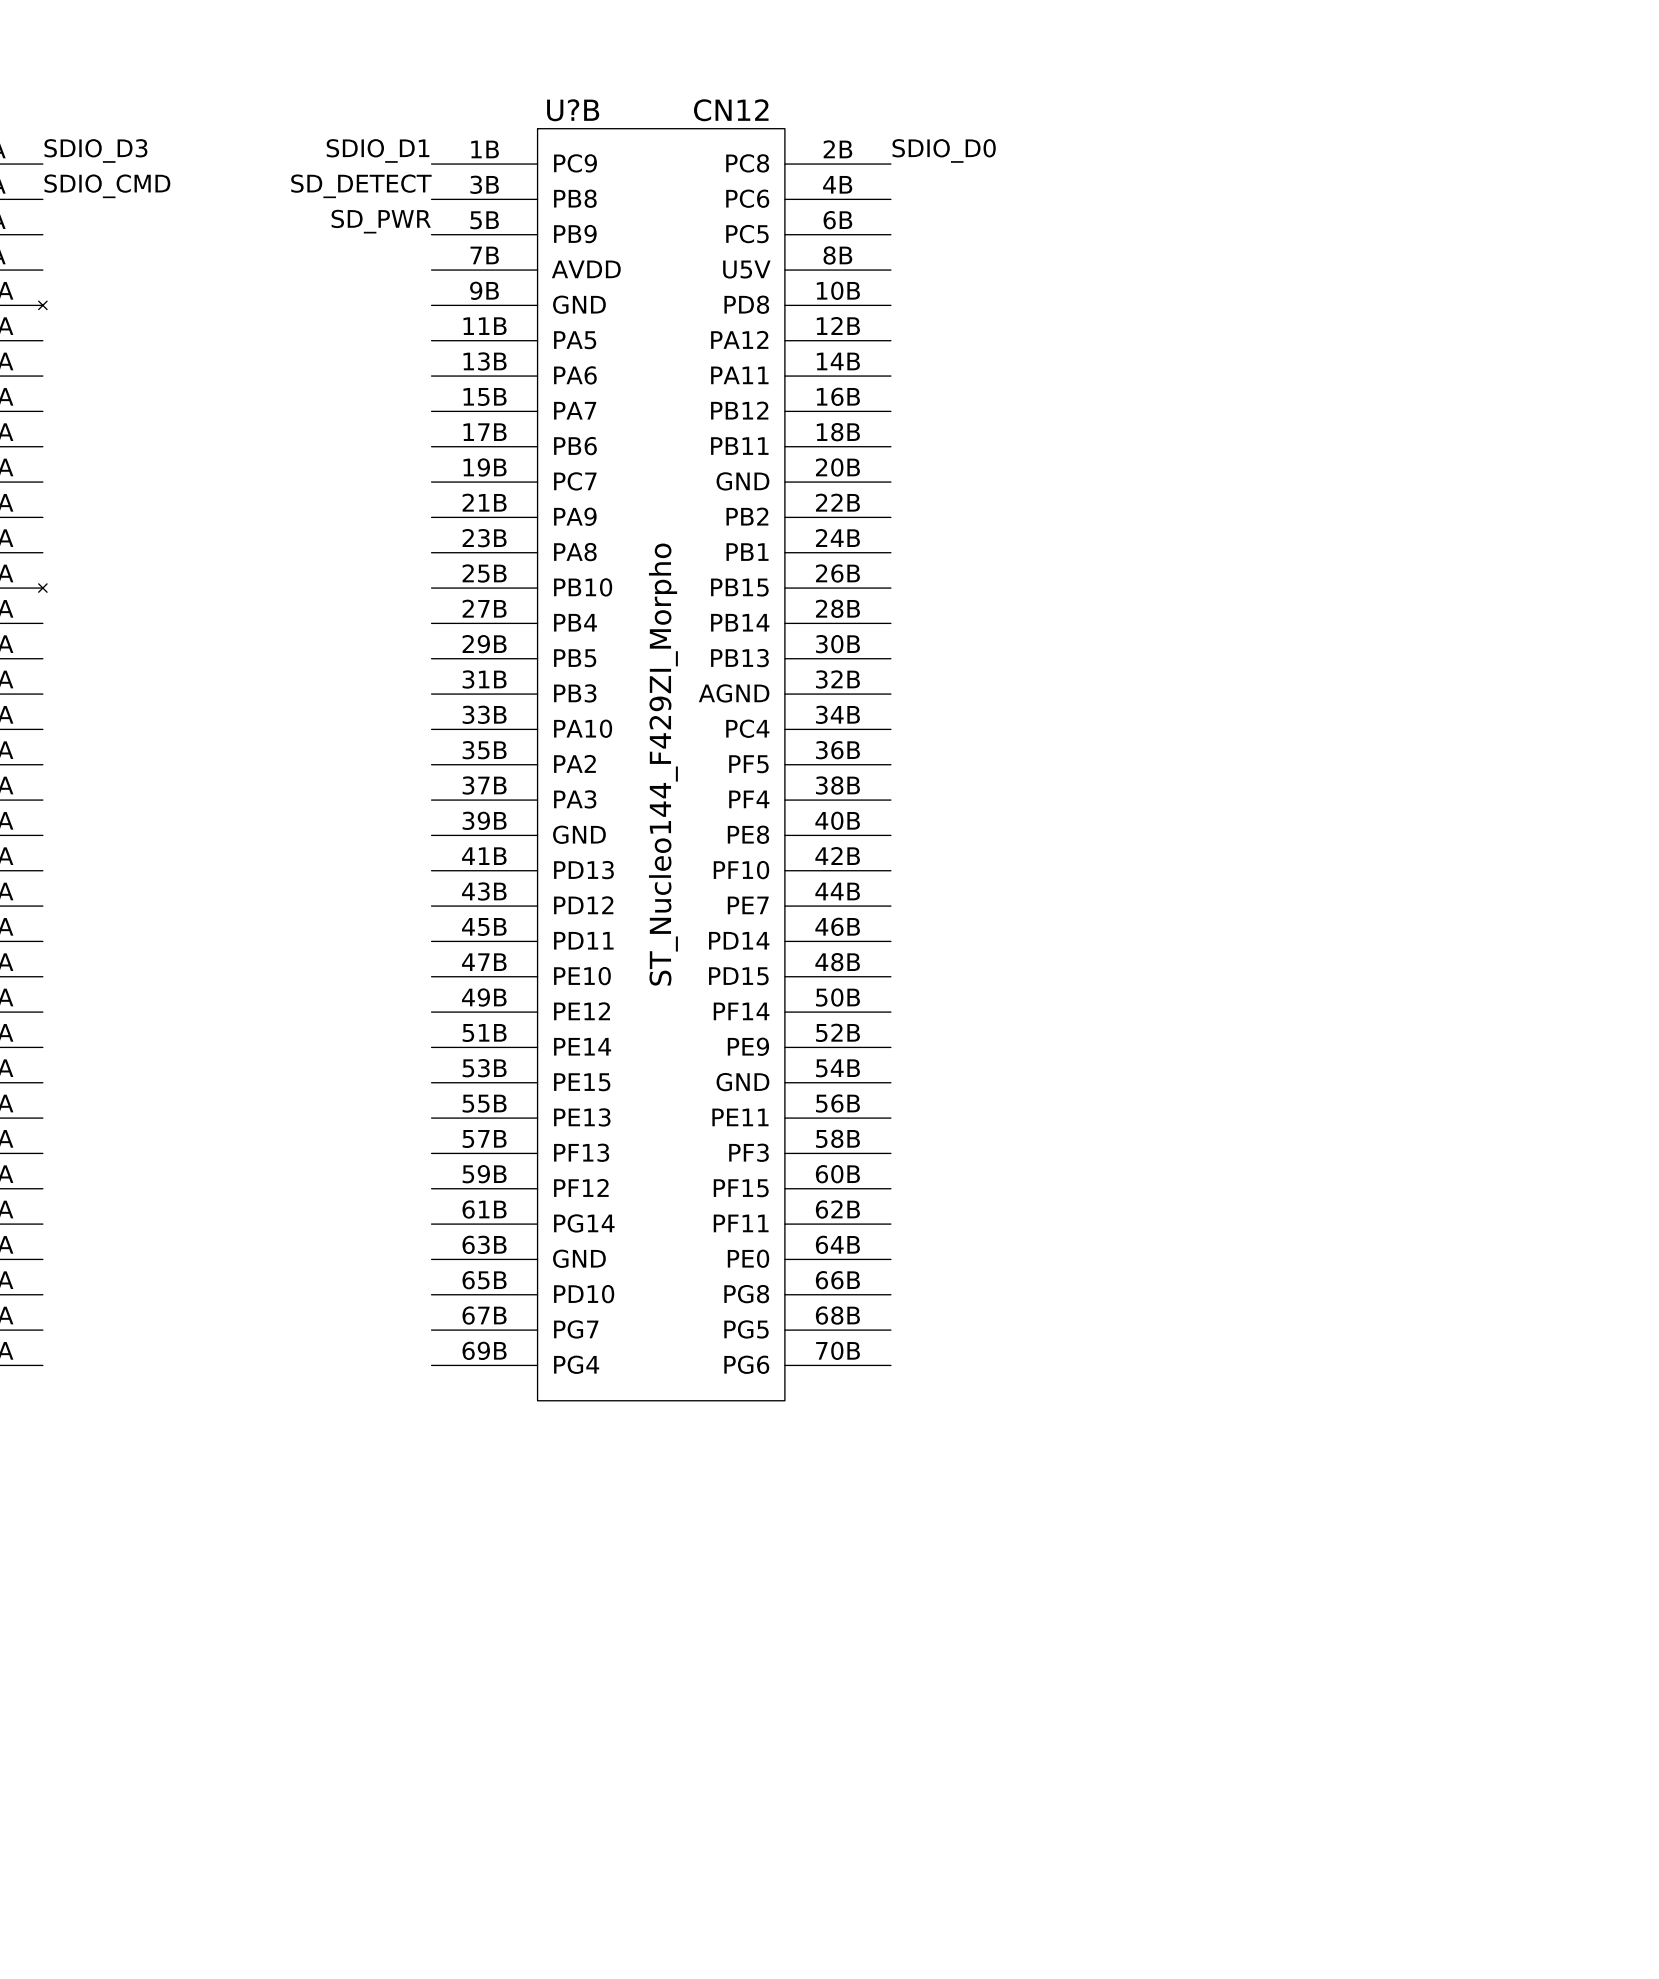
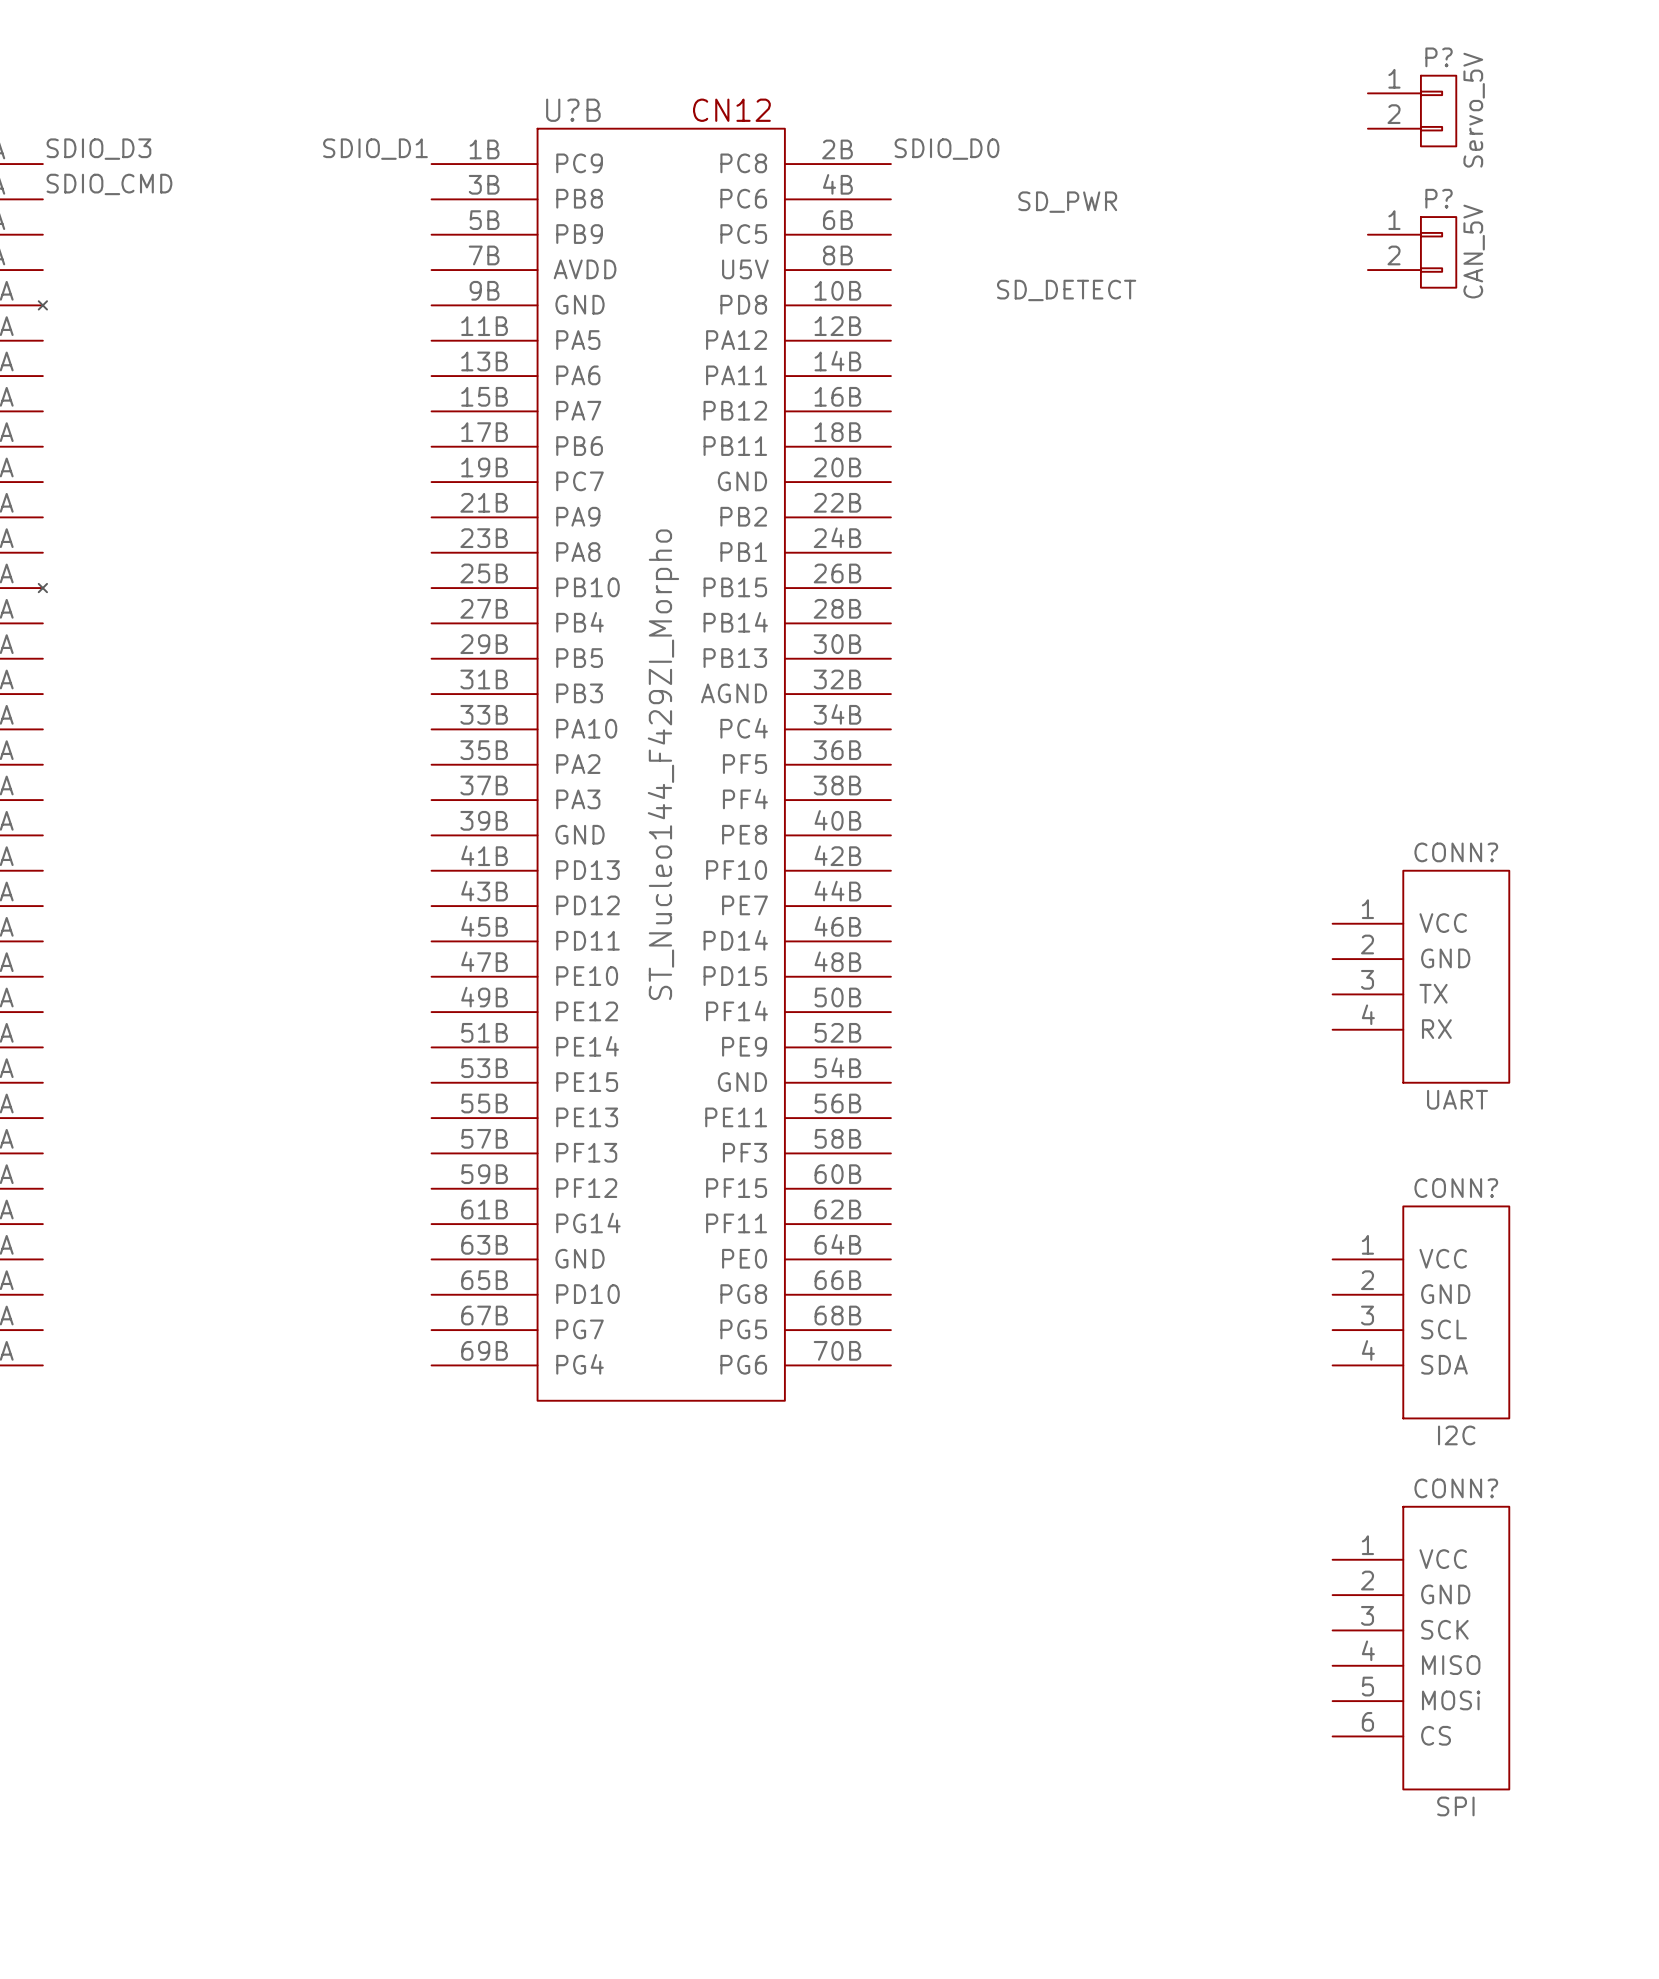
P?: none -> Servo_5V (1412, 111)
label: SD_DETECT (361, 186) -> none
label: none -> SD_PWR (1067, 202)
label: SD_PWR (381, 221) -> none
P?: none -> CAN_5V (1412, 252)
label: none -> SD_DETECT (1066, 290)
CONN?: none -> UART (1420, 976)
CONN?: none -> I2C (1420, 1312)
CONN?: none -> SPI (1420, 1648)

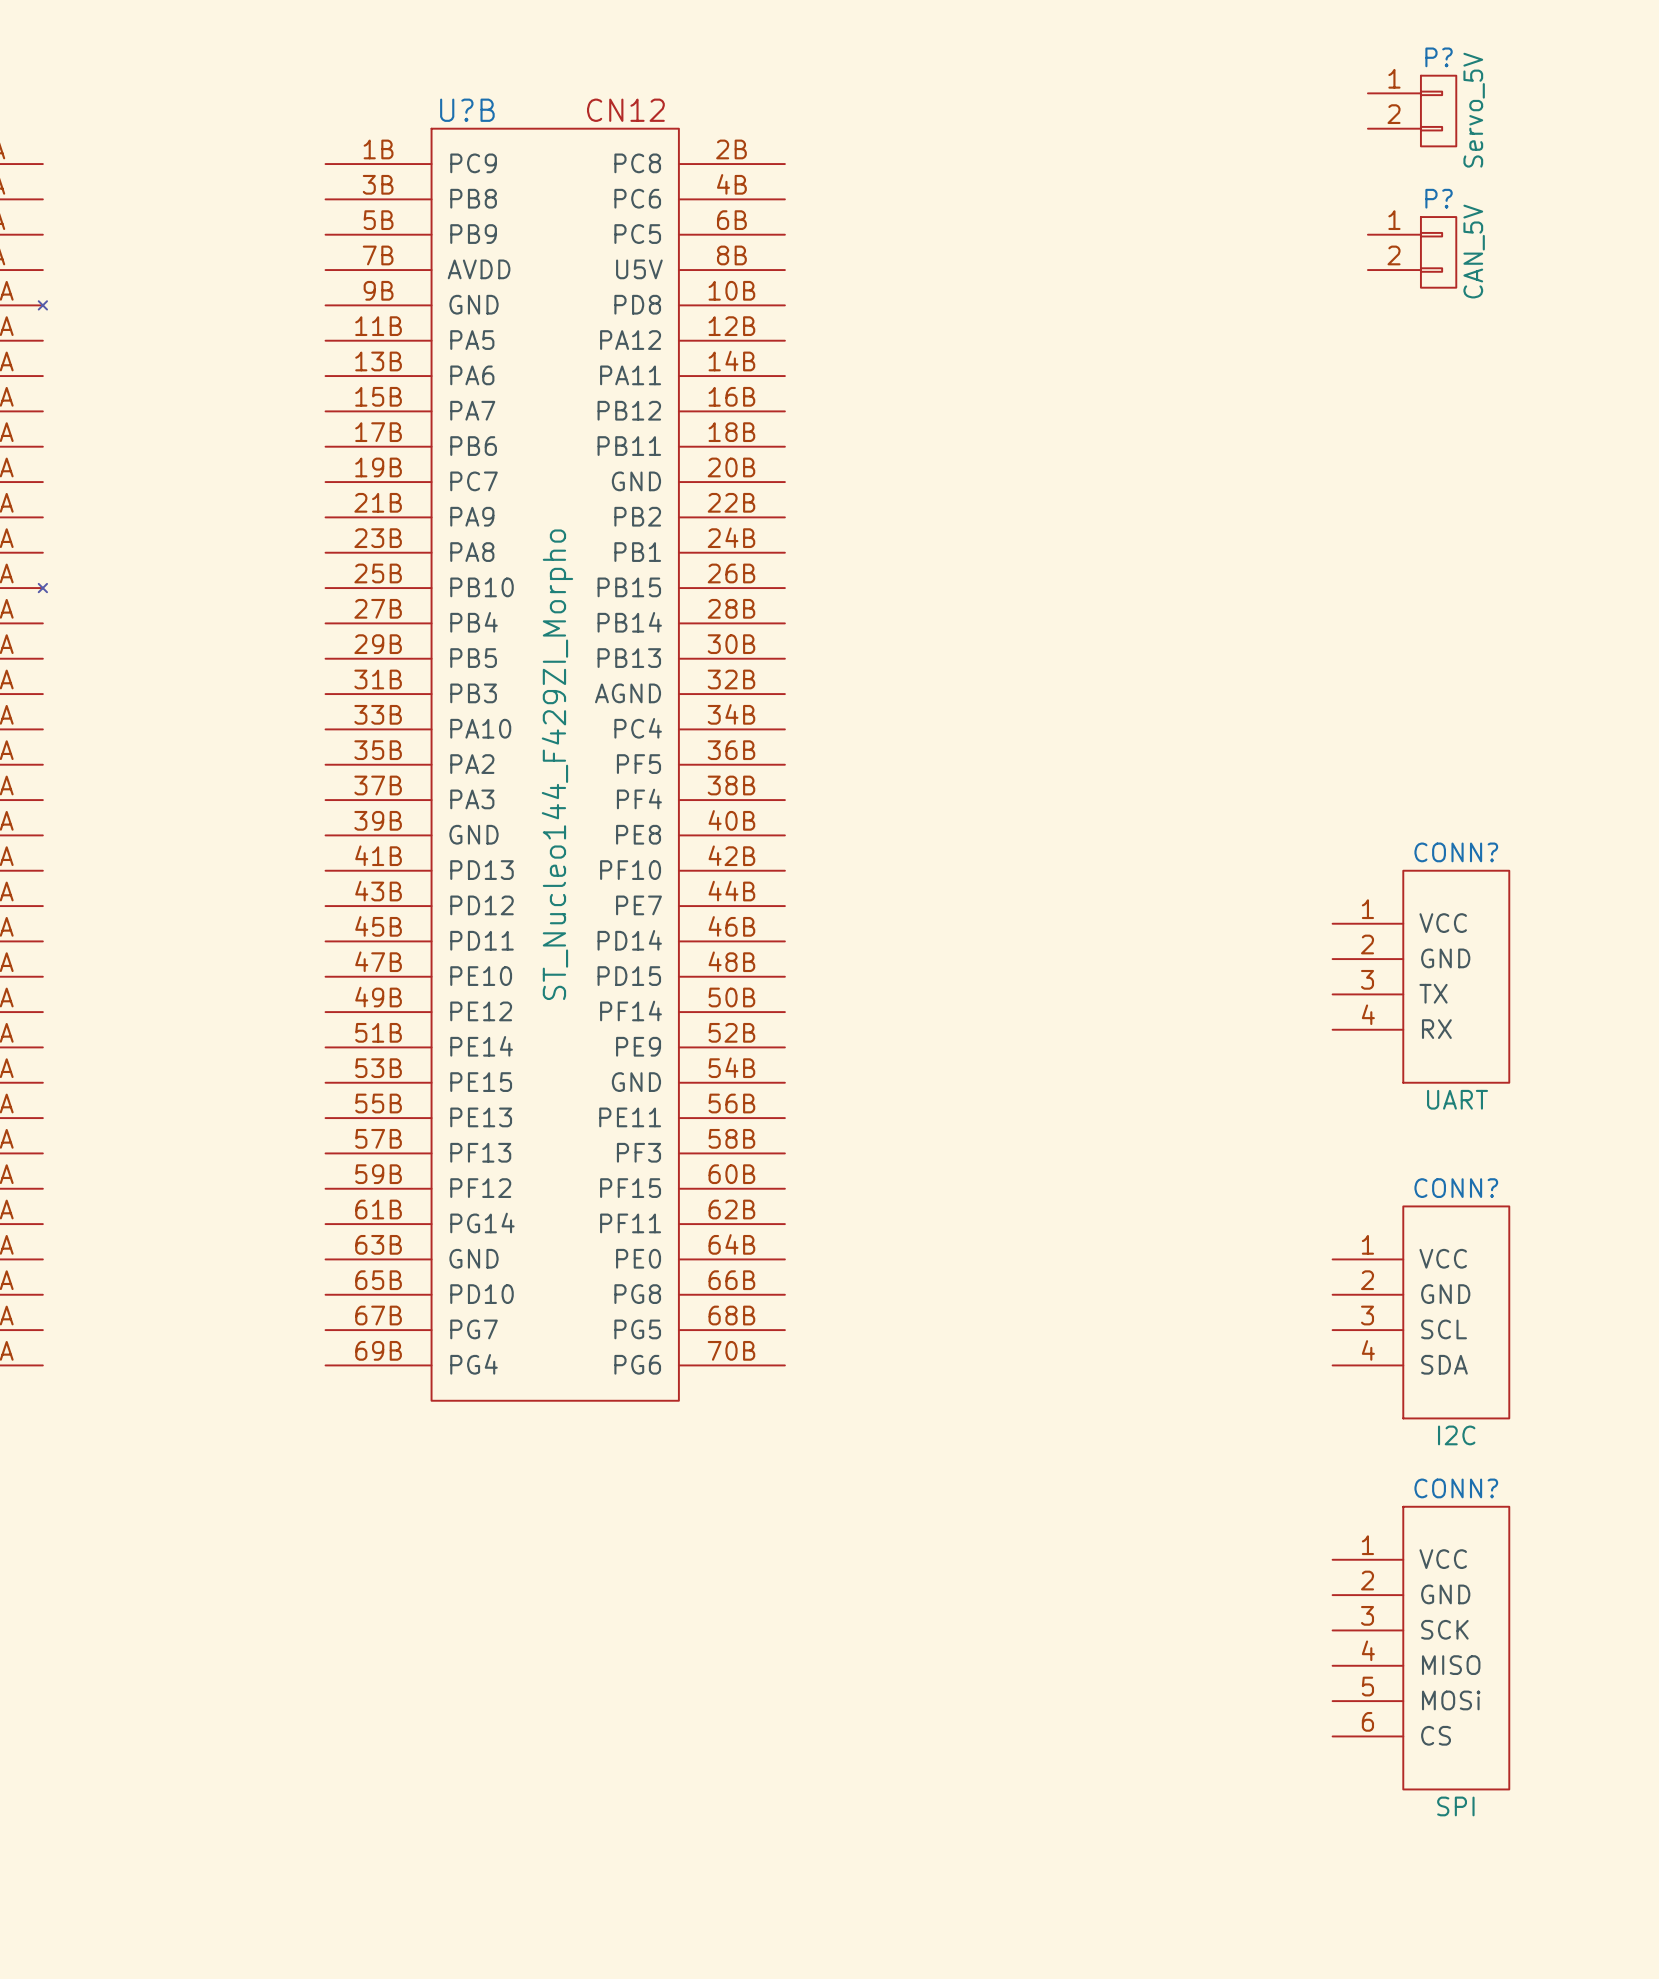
label: SDIO_D3 (98, 149) -> none
label: SDIO_D1 (375, 149) -> none
label: SDIO_D0 (946, 149) -> none
label: SDIO_CMD (109, 184) -> none
label: SD_PWR (1067, 202) -> none
label: SD_DETECT (1066, 290) -> none
U?B position: (661, 764) -> (555, 764)

